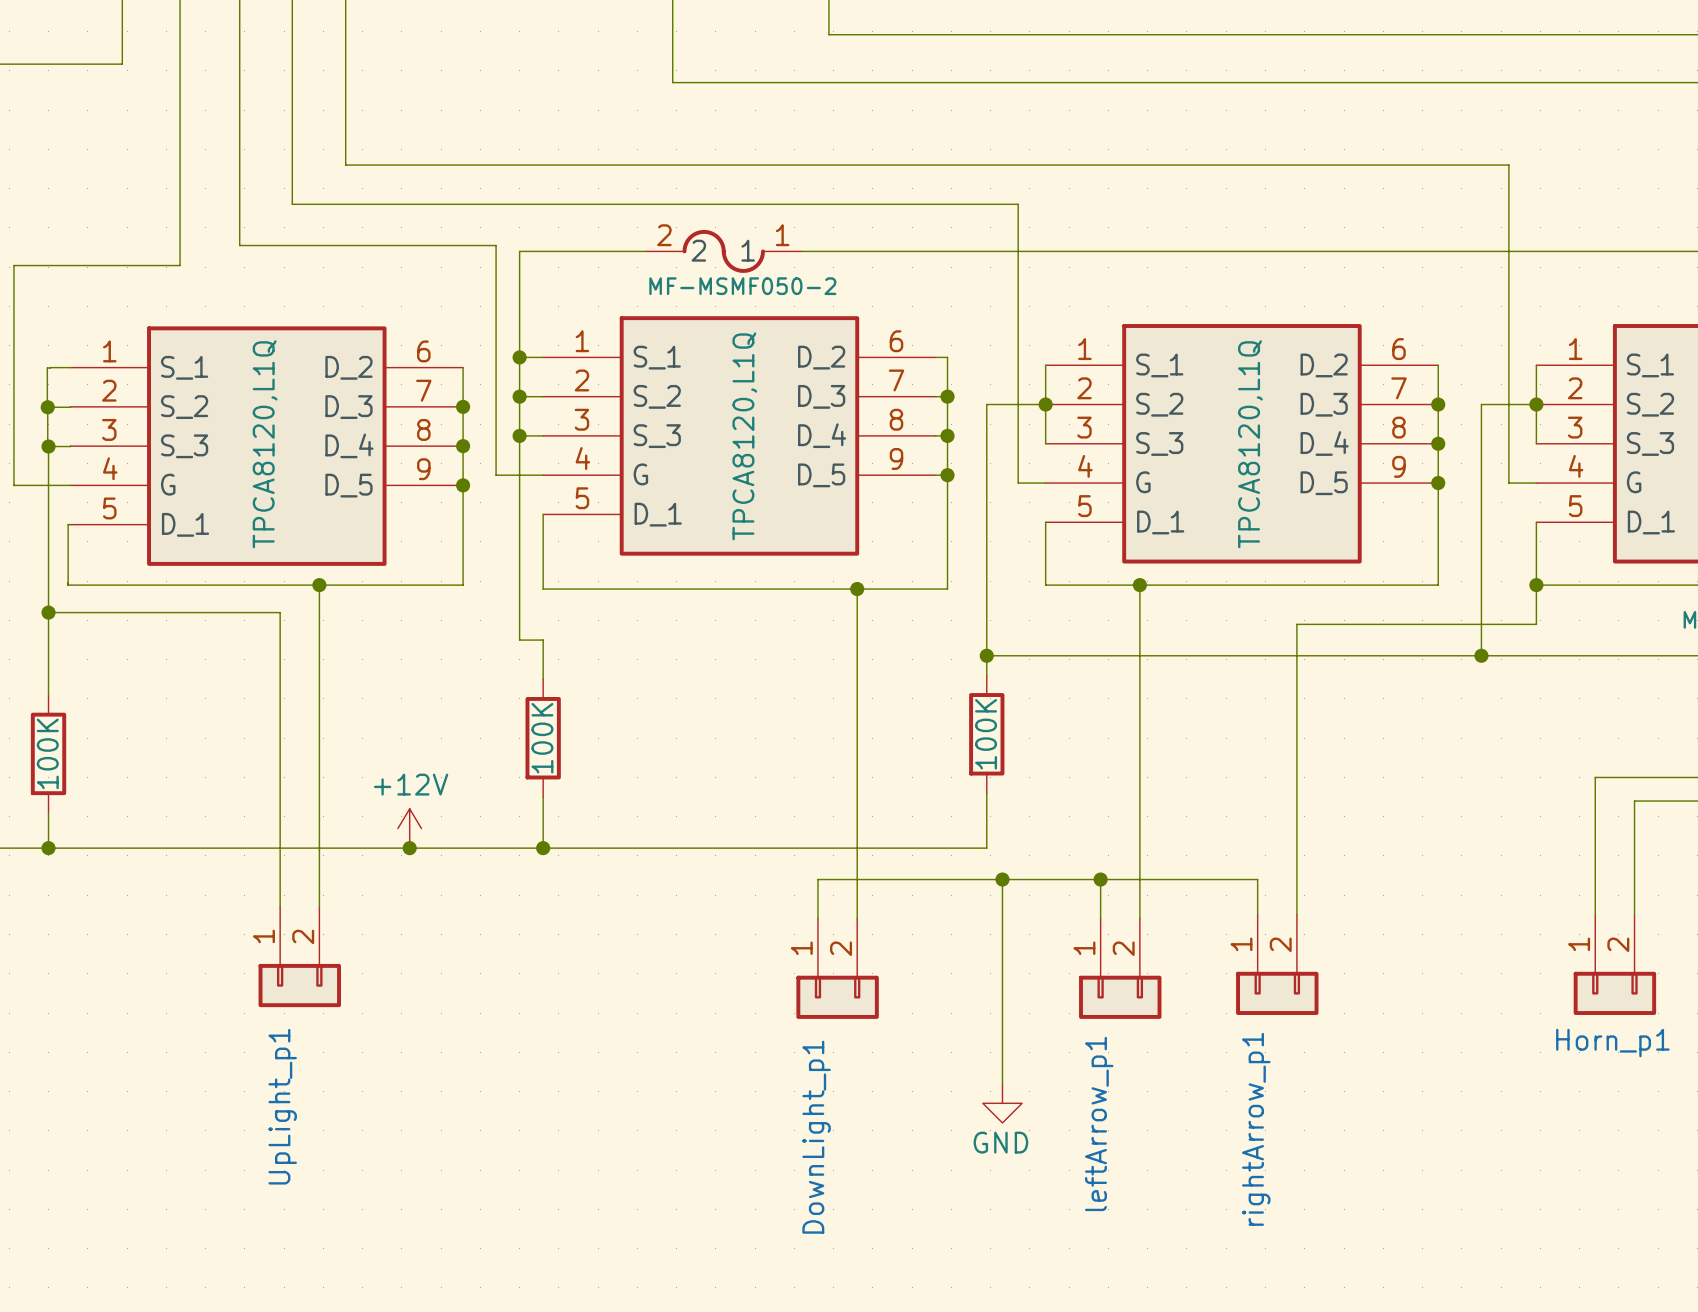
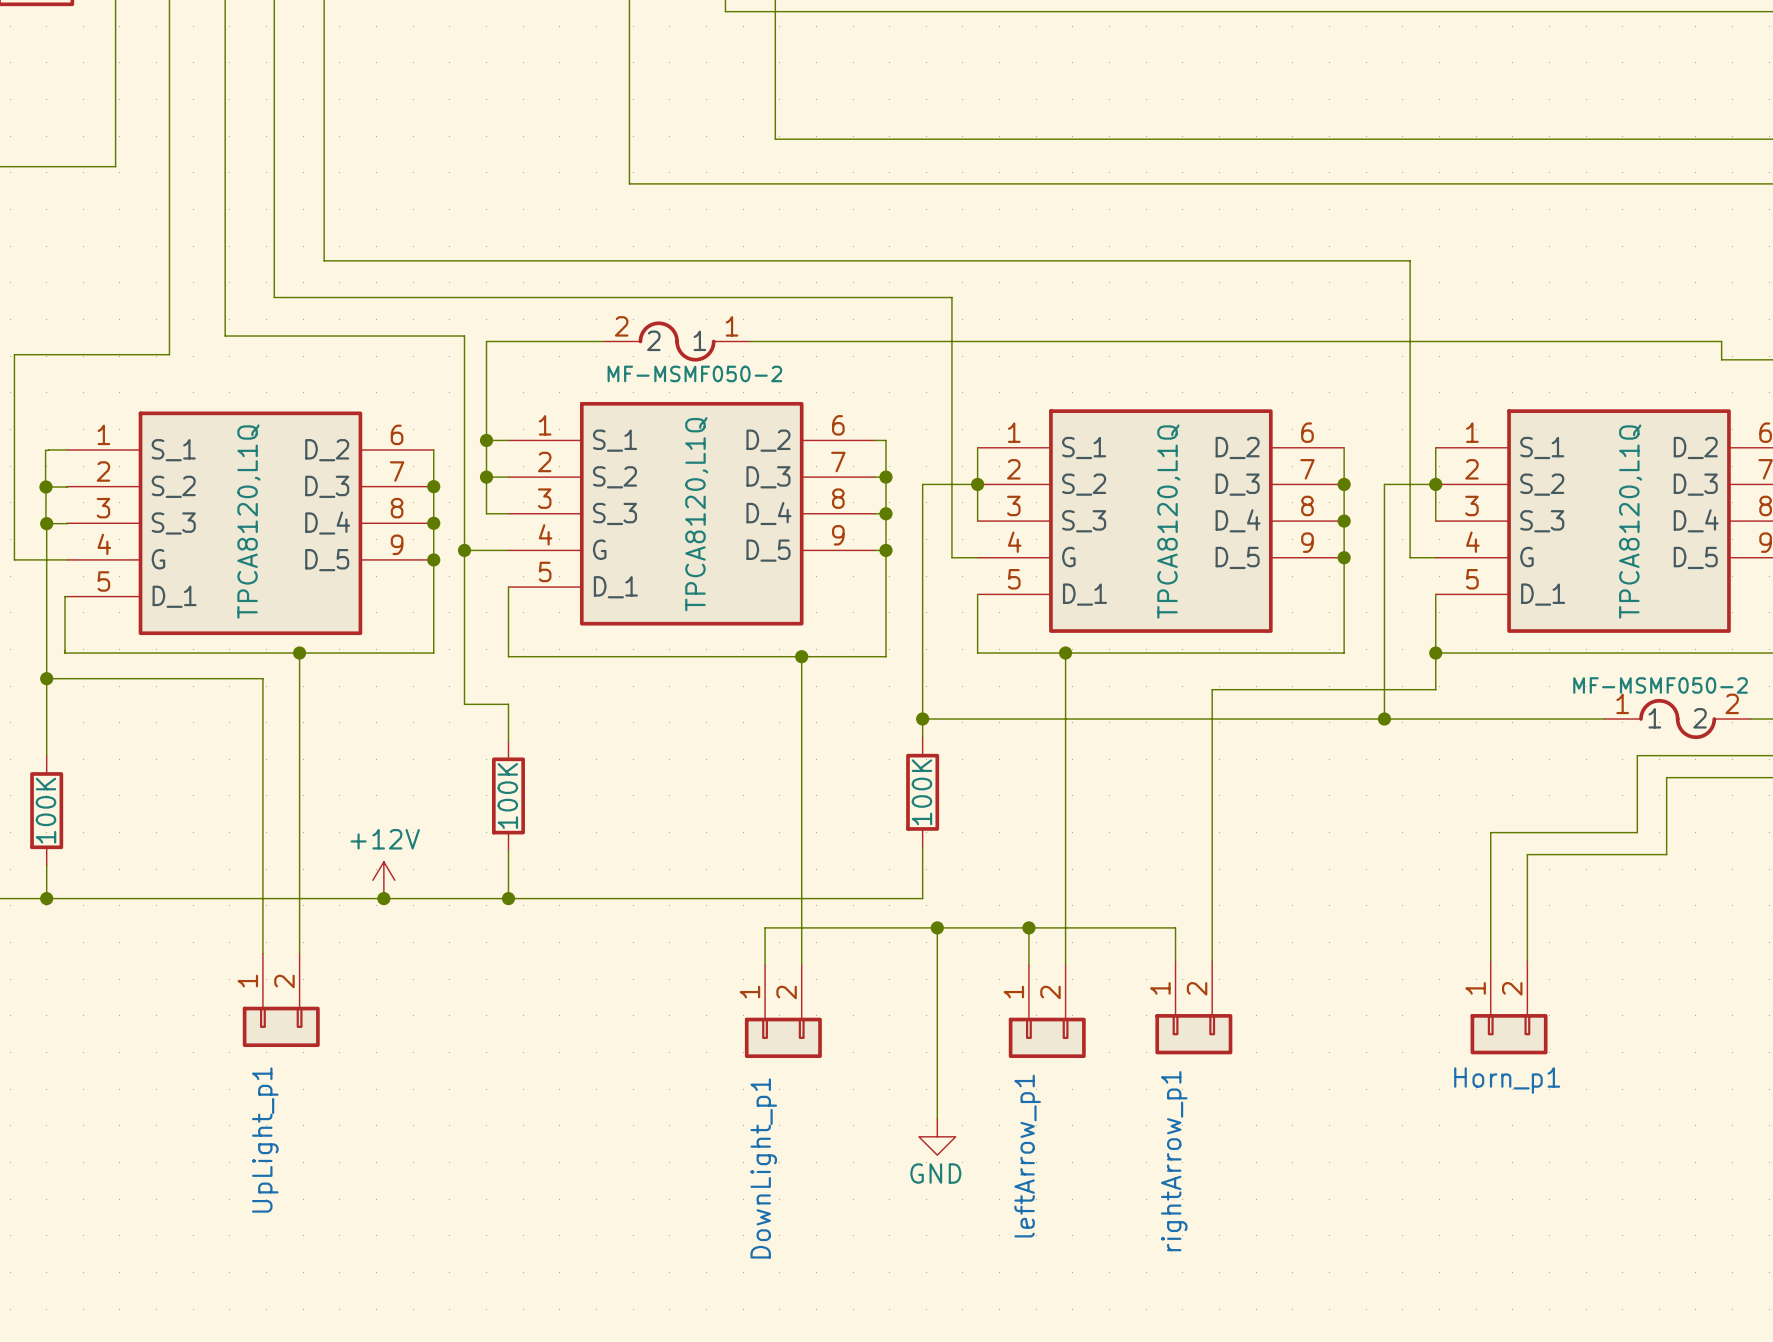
wire: (519, 435) (519, 640) -> (464, 550) (464, 704) (486, 704)
junction position: (519, 435) -> (464, 550)

